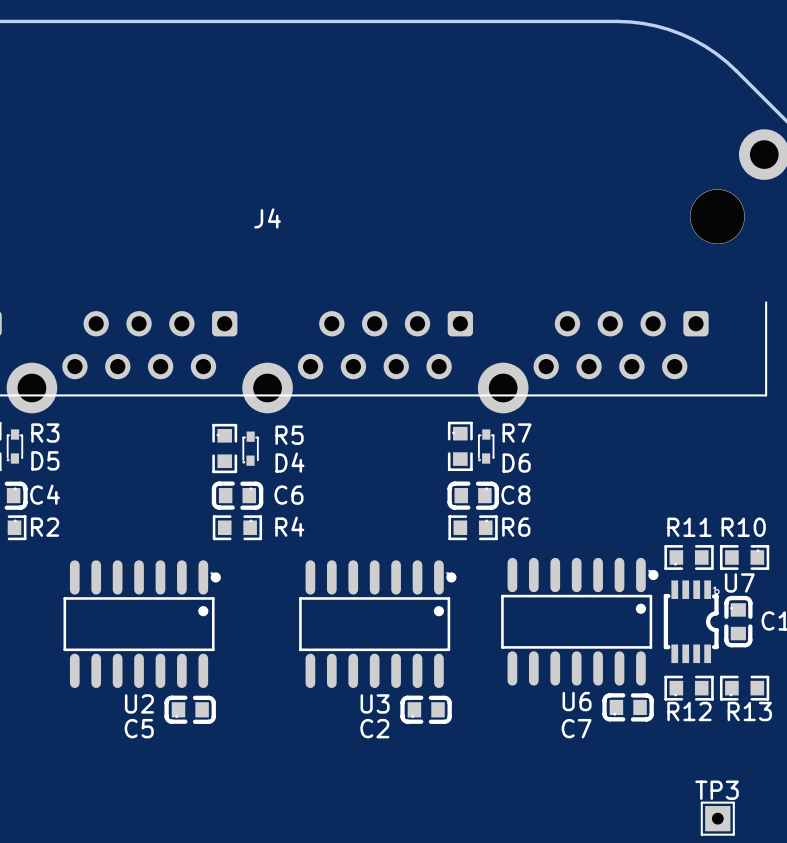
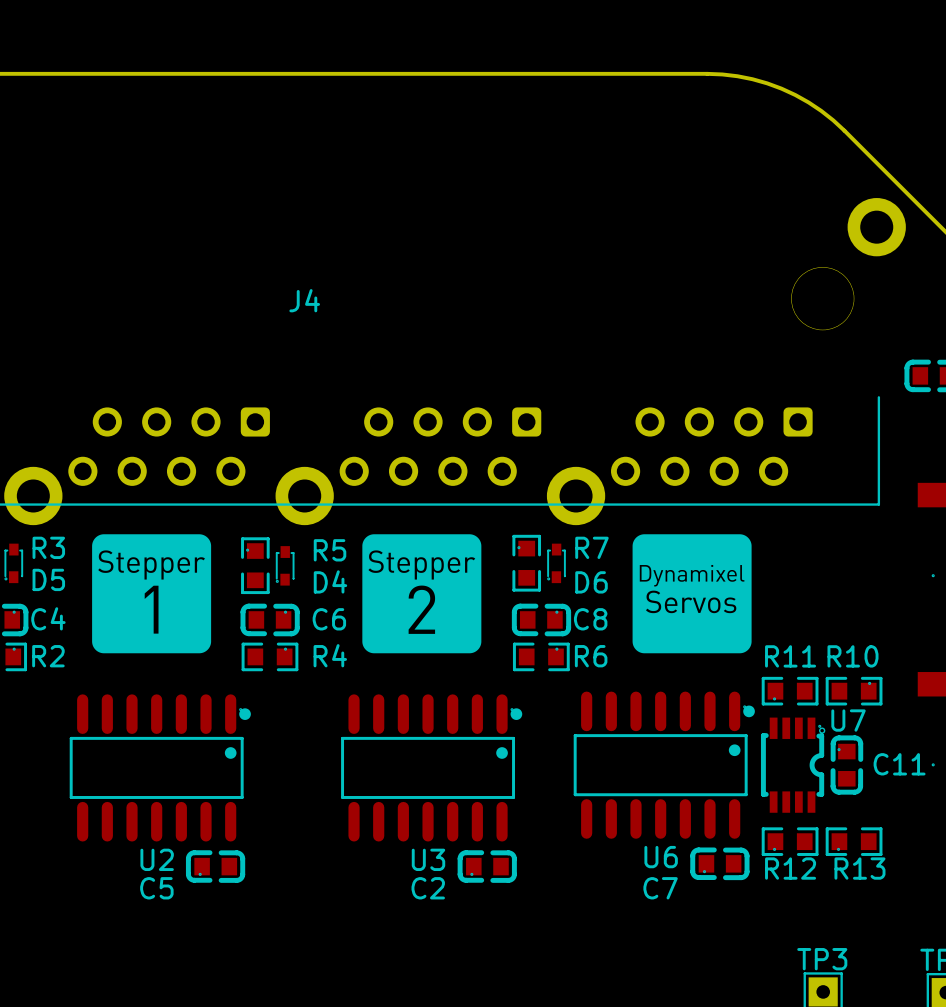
drawing: none -> [92, 534, 212, 654]
drawing: none -> [362, 534, 482, 654]
drawing: none -> [632, 534, 752, 654]

